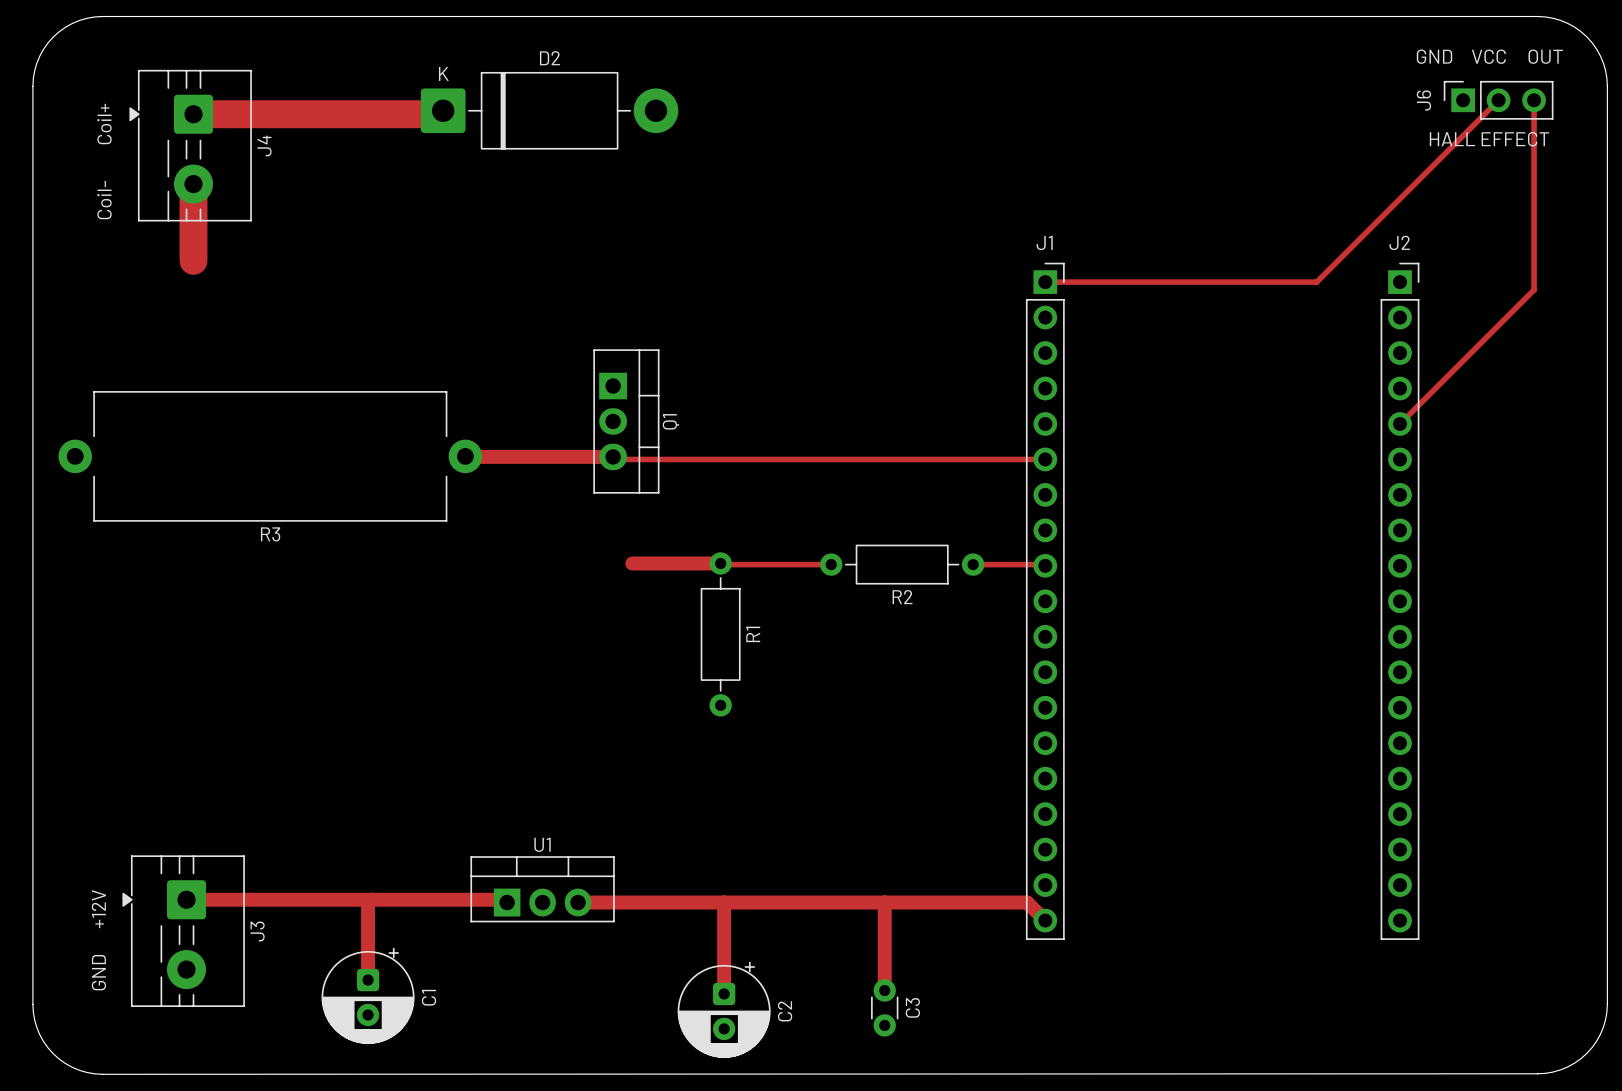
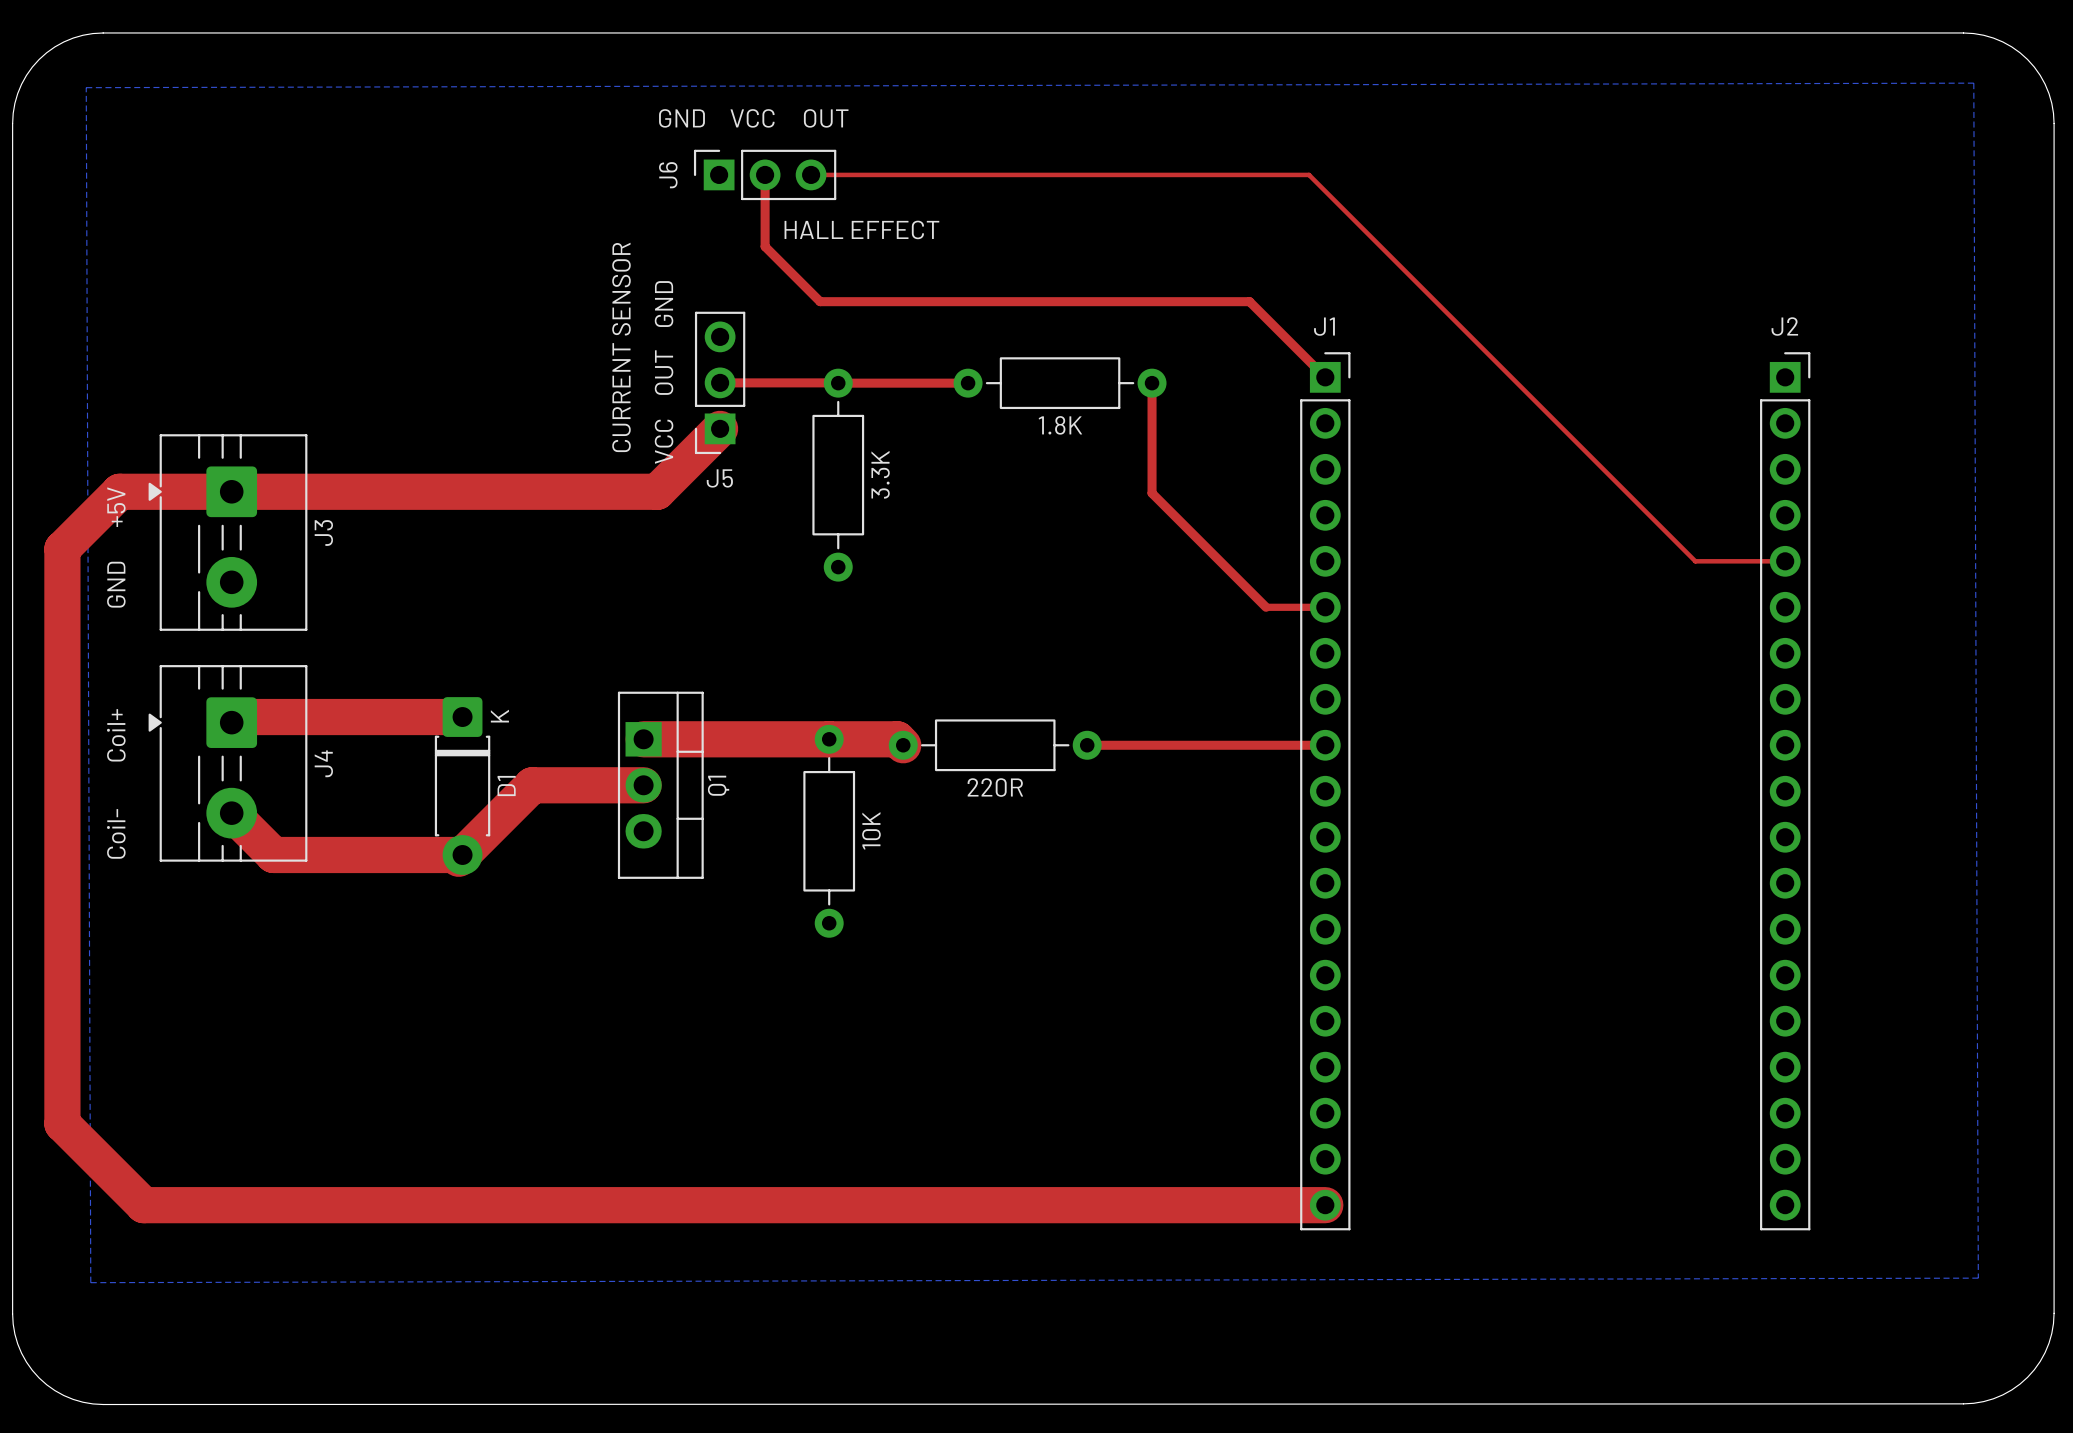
bottom zone outline: none -> (1973, 83) (86, 87) (90, 1282) (1978, 1278) (1973, 83)
text: GND (1434, 56) -> none
text: VCC (1488, 56) -> none
text: OUT (1545, 56) -> none
text: none -> GND (681, 118)
text: none -> VCC (752, 118)
text: none -> OUT (826, 118)
top track: (1498, 100) (1316, 282) (1045, 282) -> (765, 174) (765, 246) (820, 301) (1249, 301) (1325, 377)
J6 position: (1498, 100) -> (765, 174)
top track: (1534, 100) (1534, 289) (1400, 423) -> (811, 174) (1309, 174) (1695, 561) (1785, 561)
top track: (197, 109) (193, 114) (439, 114) (443, 110) -> none
D2: (549, 110) -> none
text: Coil+ (104, 124) -> none
text: HALL EFFECT (1489, 139) -> none
J4 position: (190, 145) -> (227, 763)
text: none -> HALL EFFECT (861, 229)
top track: (193, 184) (193, 260) -> none
text: Coil- (104, 200) -> none
text: none -> GND (664, 304)
text: none -> CURRENT SENSOR (621, 347)
text: none -> OUT (664, 372)
top track: none -> (720, 382) (968, 383)
J5: none -> (720, 382)
1.8K: none -> (1060, 383)
text: none -> VCC (664, 441)
3.3K: none -> (838, 475)
text: none -> +5V (116, 507)
Q1 position: (626, 421) -> (660, 785)
text: none -> GND (116, 584)
R3: (270, 456) -> none
top track: (465, 456) (613, 456) (615, 459) (999, 459) -> (1152, 383) (1152, 493) (1266, 607)
top track: none -> (462, 717) (237, 717) (231, 722)
text: none -> Coil+ (116, 735)
top track: none -> (643, 739) (897, 739) (903, 745)
top track: (632, 563) (831, 564) -> none
R2: (902, 564) -> none
220R: none -> (995, 745)
top track: (974, 565) (973, 564) (1045, 565) -> (1088, 745) (1325, 745)
top track: none -> (643, 785) (532, 785) (458, 858)
D1: none -> (462, 786)
top track: none -> (231, 813) (273, 854) (462, 854)
10K: none -> (829, 831)
text: none -> Coil- (116, 833)
R1: (720, 634) -> none
U1: (542, 889) -> none
top track: (186, 899) (504, 899) (507, 902) -> none
top track: (371, 899) (368, 903) (368, 980) -> none
top track: (578, 902) (1027, 902) (1045, 920) -> (720, 428) (657, 491) (119, 491) (62, 549) (62, 1123) (143, 1205) (1325, 1205)
top track: (724, 902) (724, 994) -> none
top track: (884, 902) (884, 990) -> none
text: +12V (98, 909) -> none
J3 position: (183, 931) -> (227, 532)
text: GND (98, 972) -> none
C1: (368, 995) -> none
C3: (884, 1007) -> none
C2: (724, 1009) -> none

